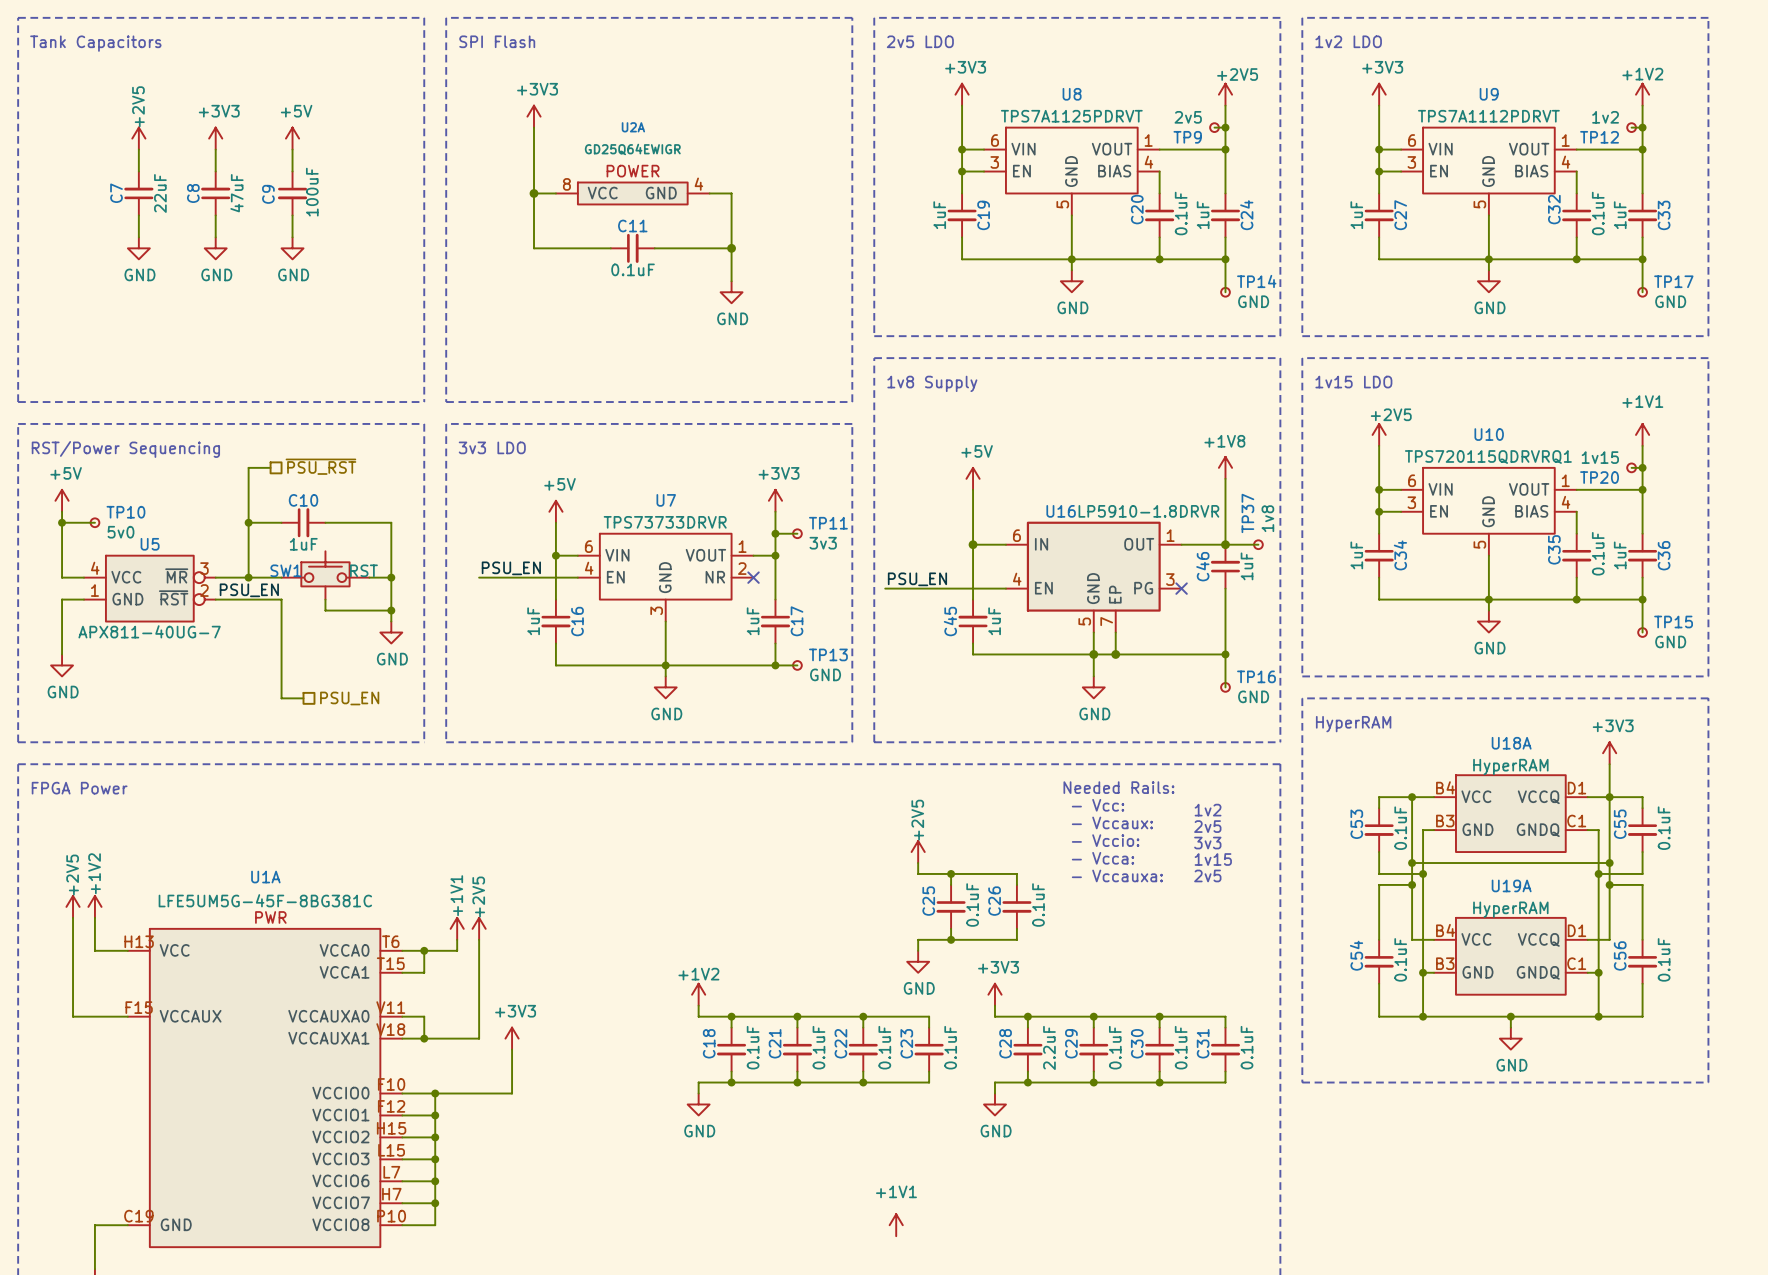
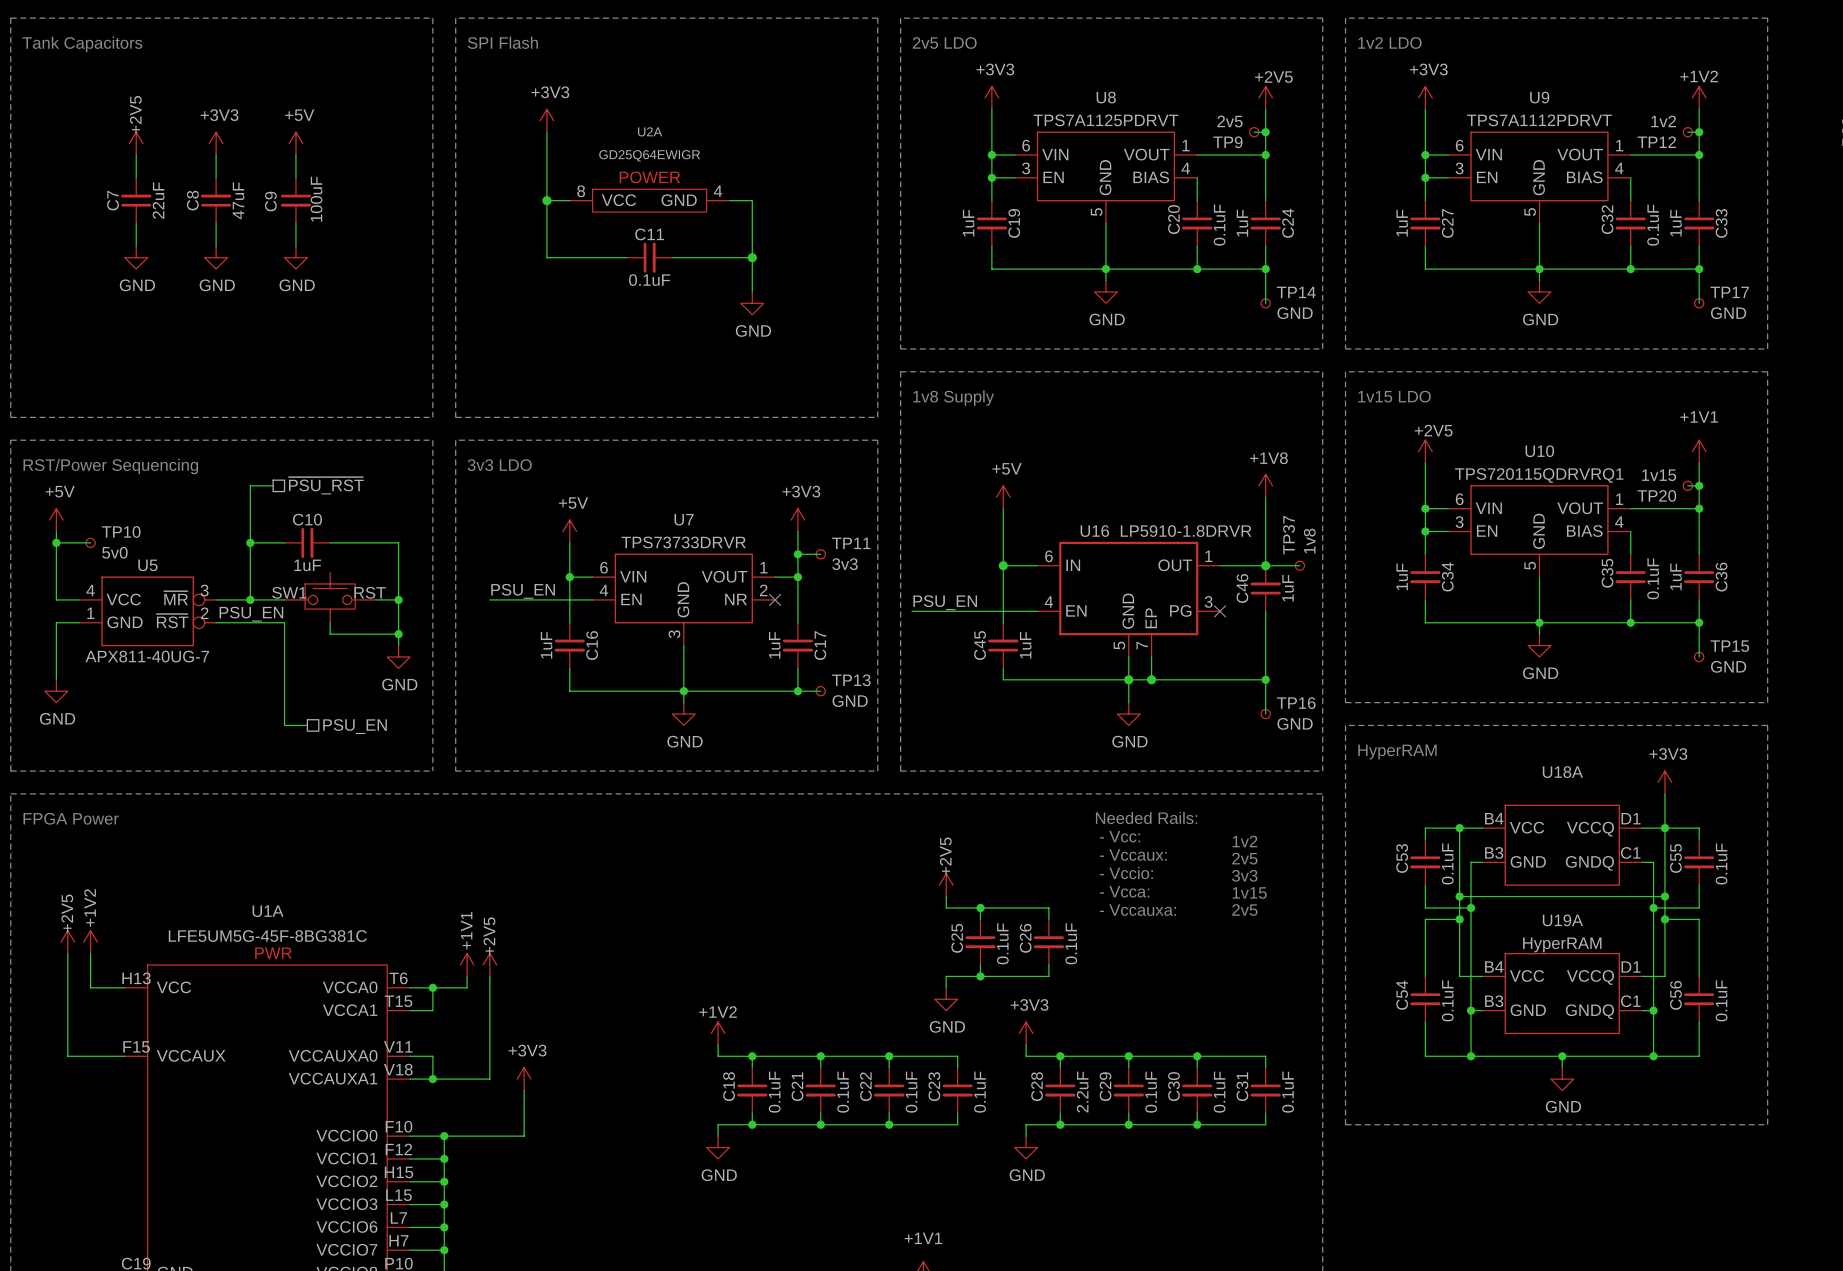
U18A value: HyperRAM (1510, 767) -> none

